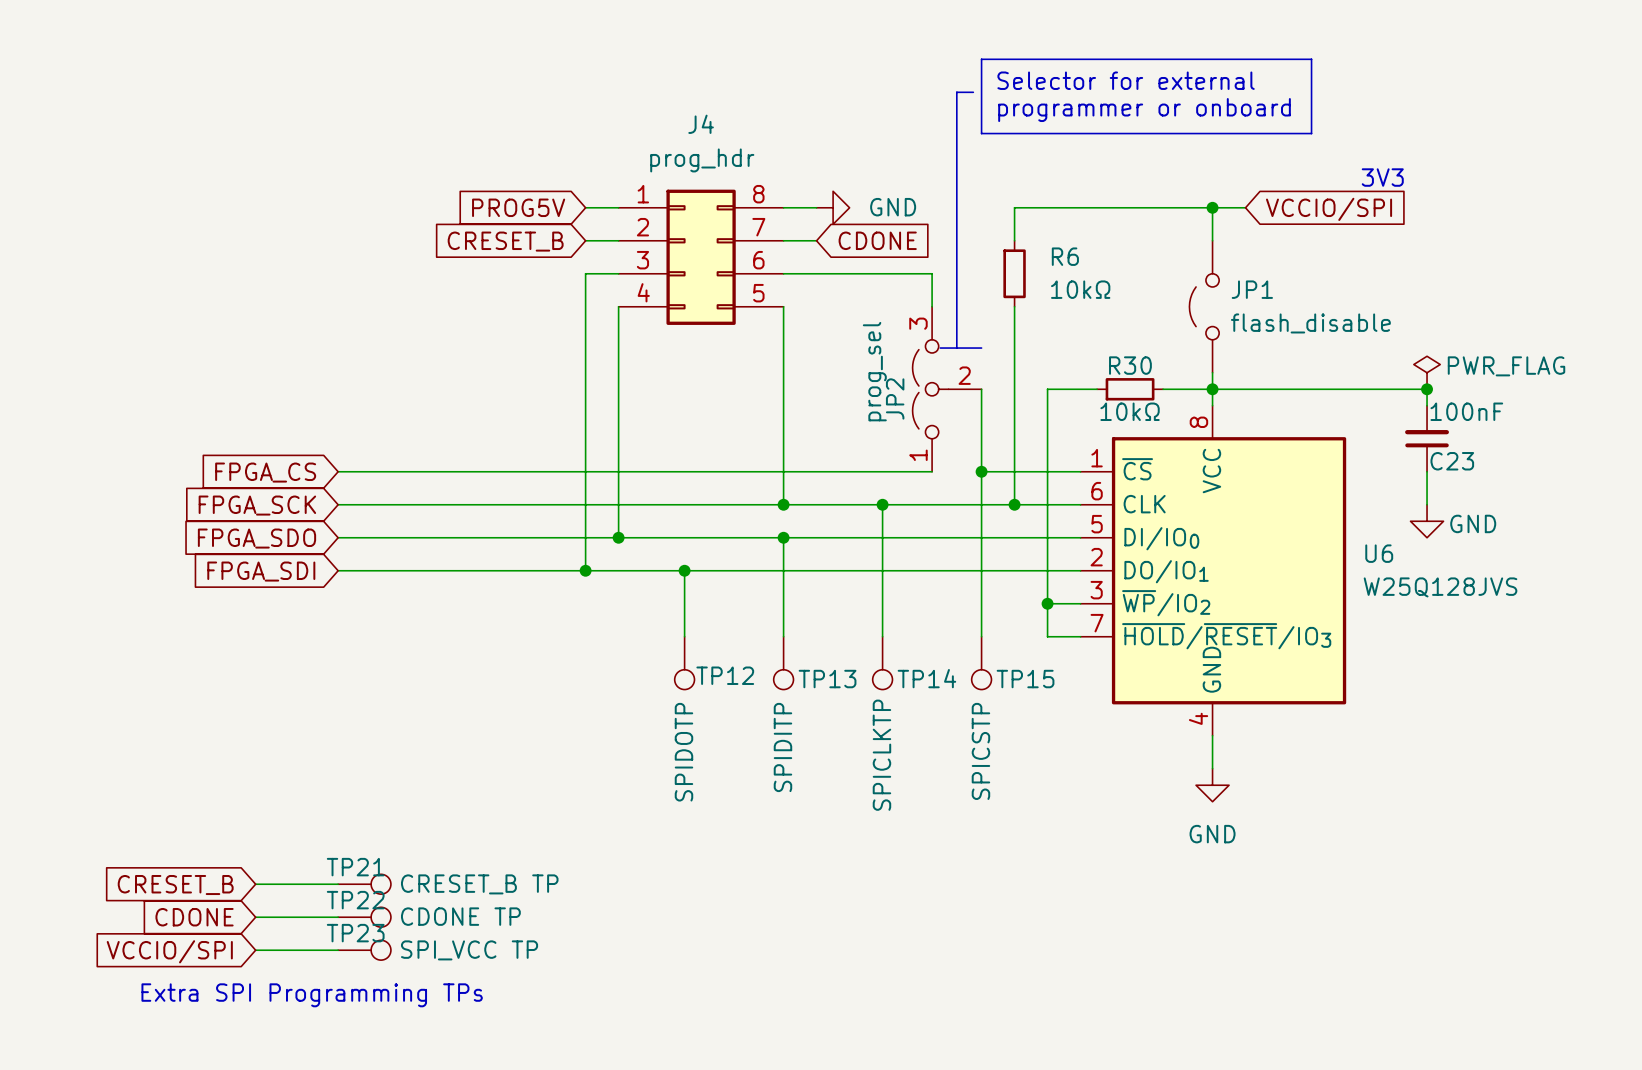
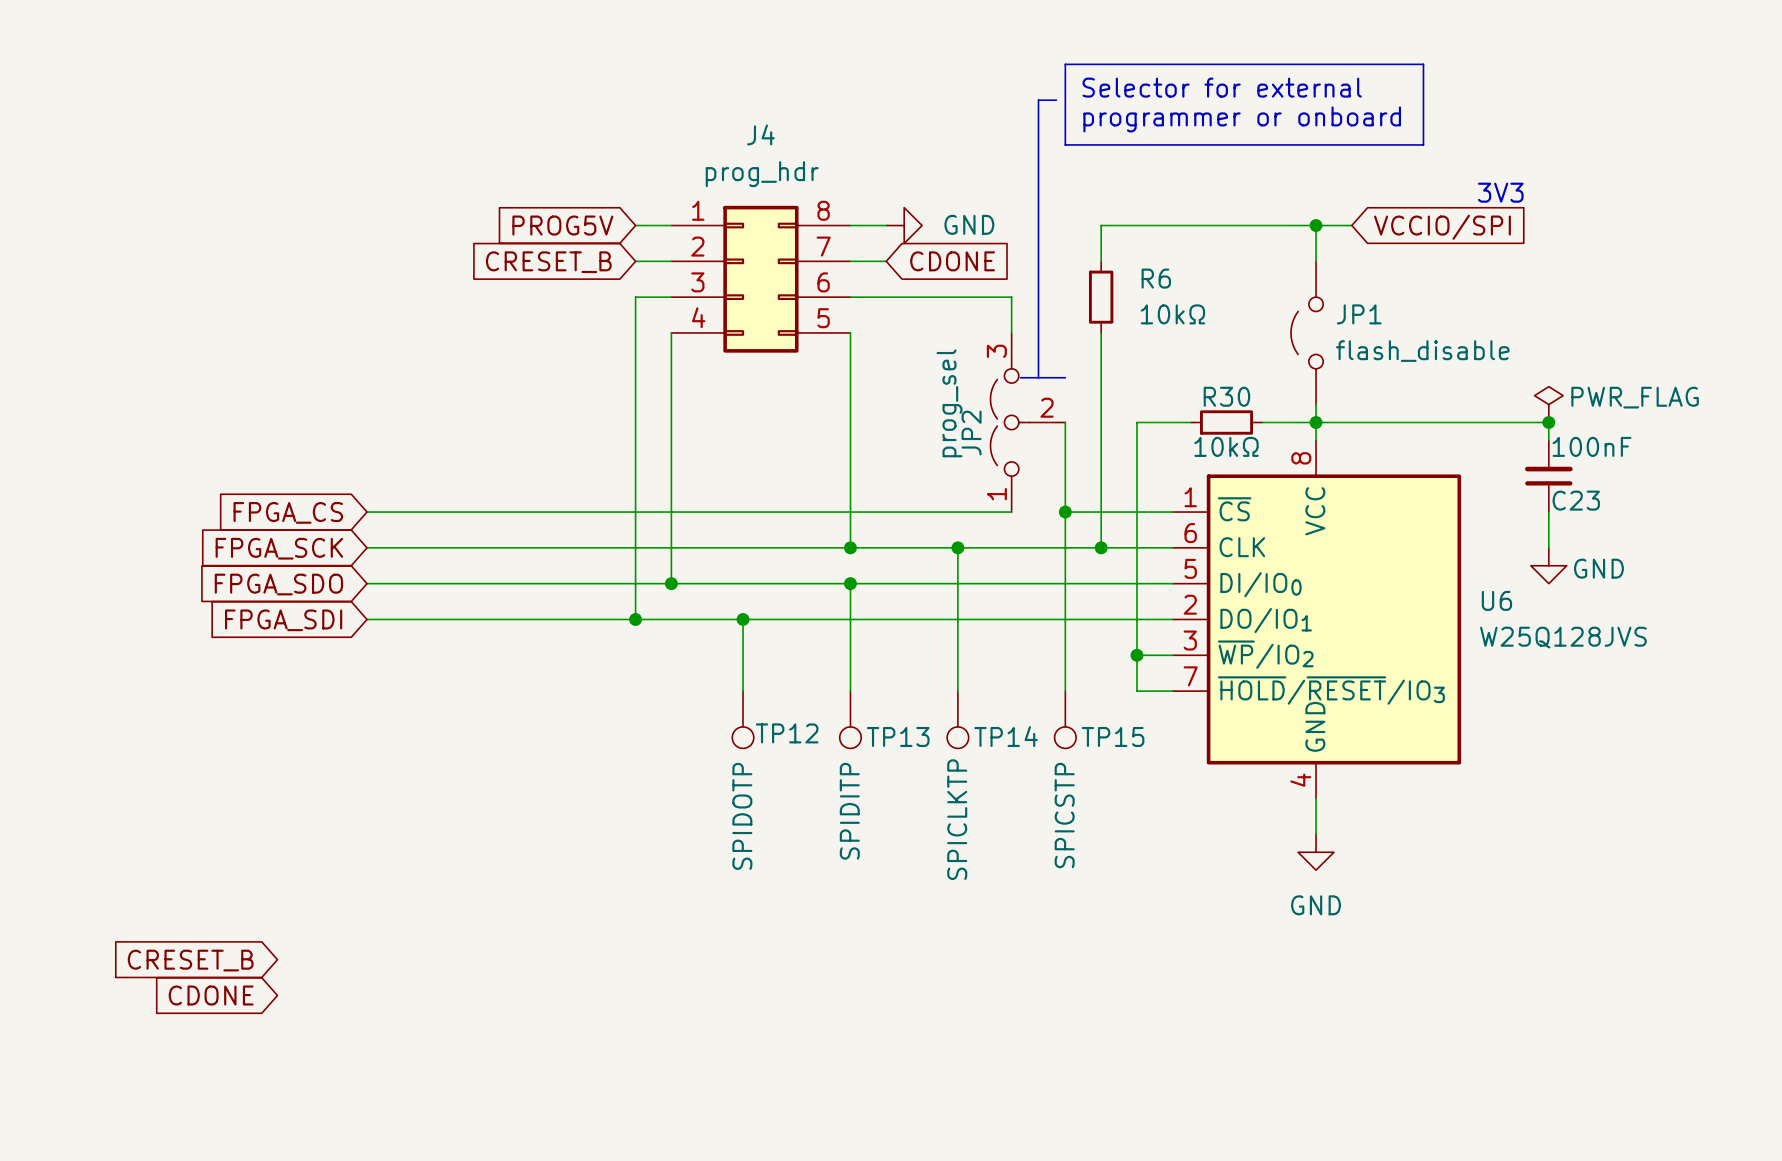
wire: (255, 884) (338, 884) -> none
TP21: CRESET_B TP (364, 884) -> none
wire: (255, 917) (338, 917) -> none
TP22: CDONE TP (364, 917) -> none
wire: (255, 950) (338, 950) -> none
TP23: SPI_VCC TP (364, 950) -> none
global label: VCCIO/SPI (169, 951) -> none
text: Extra SPI Programming TPs (312, 995) -> none

